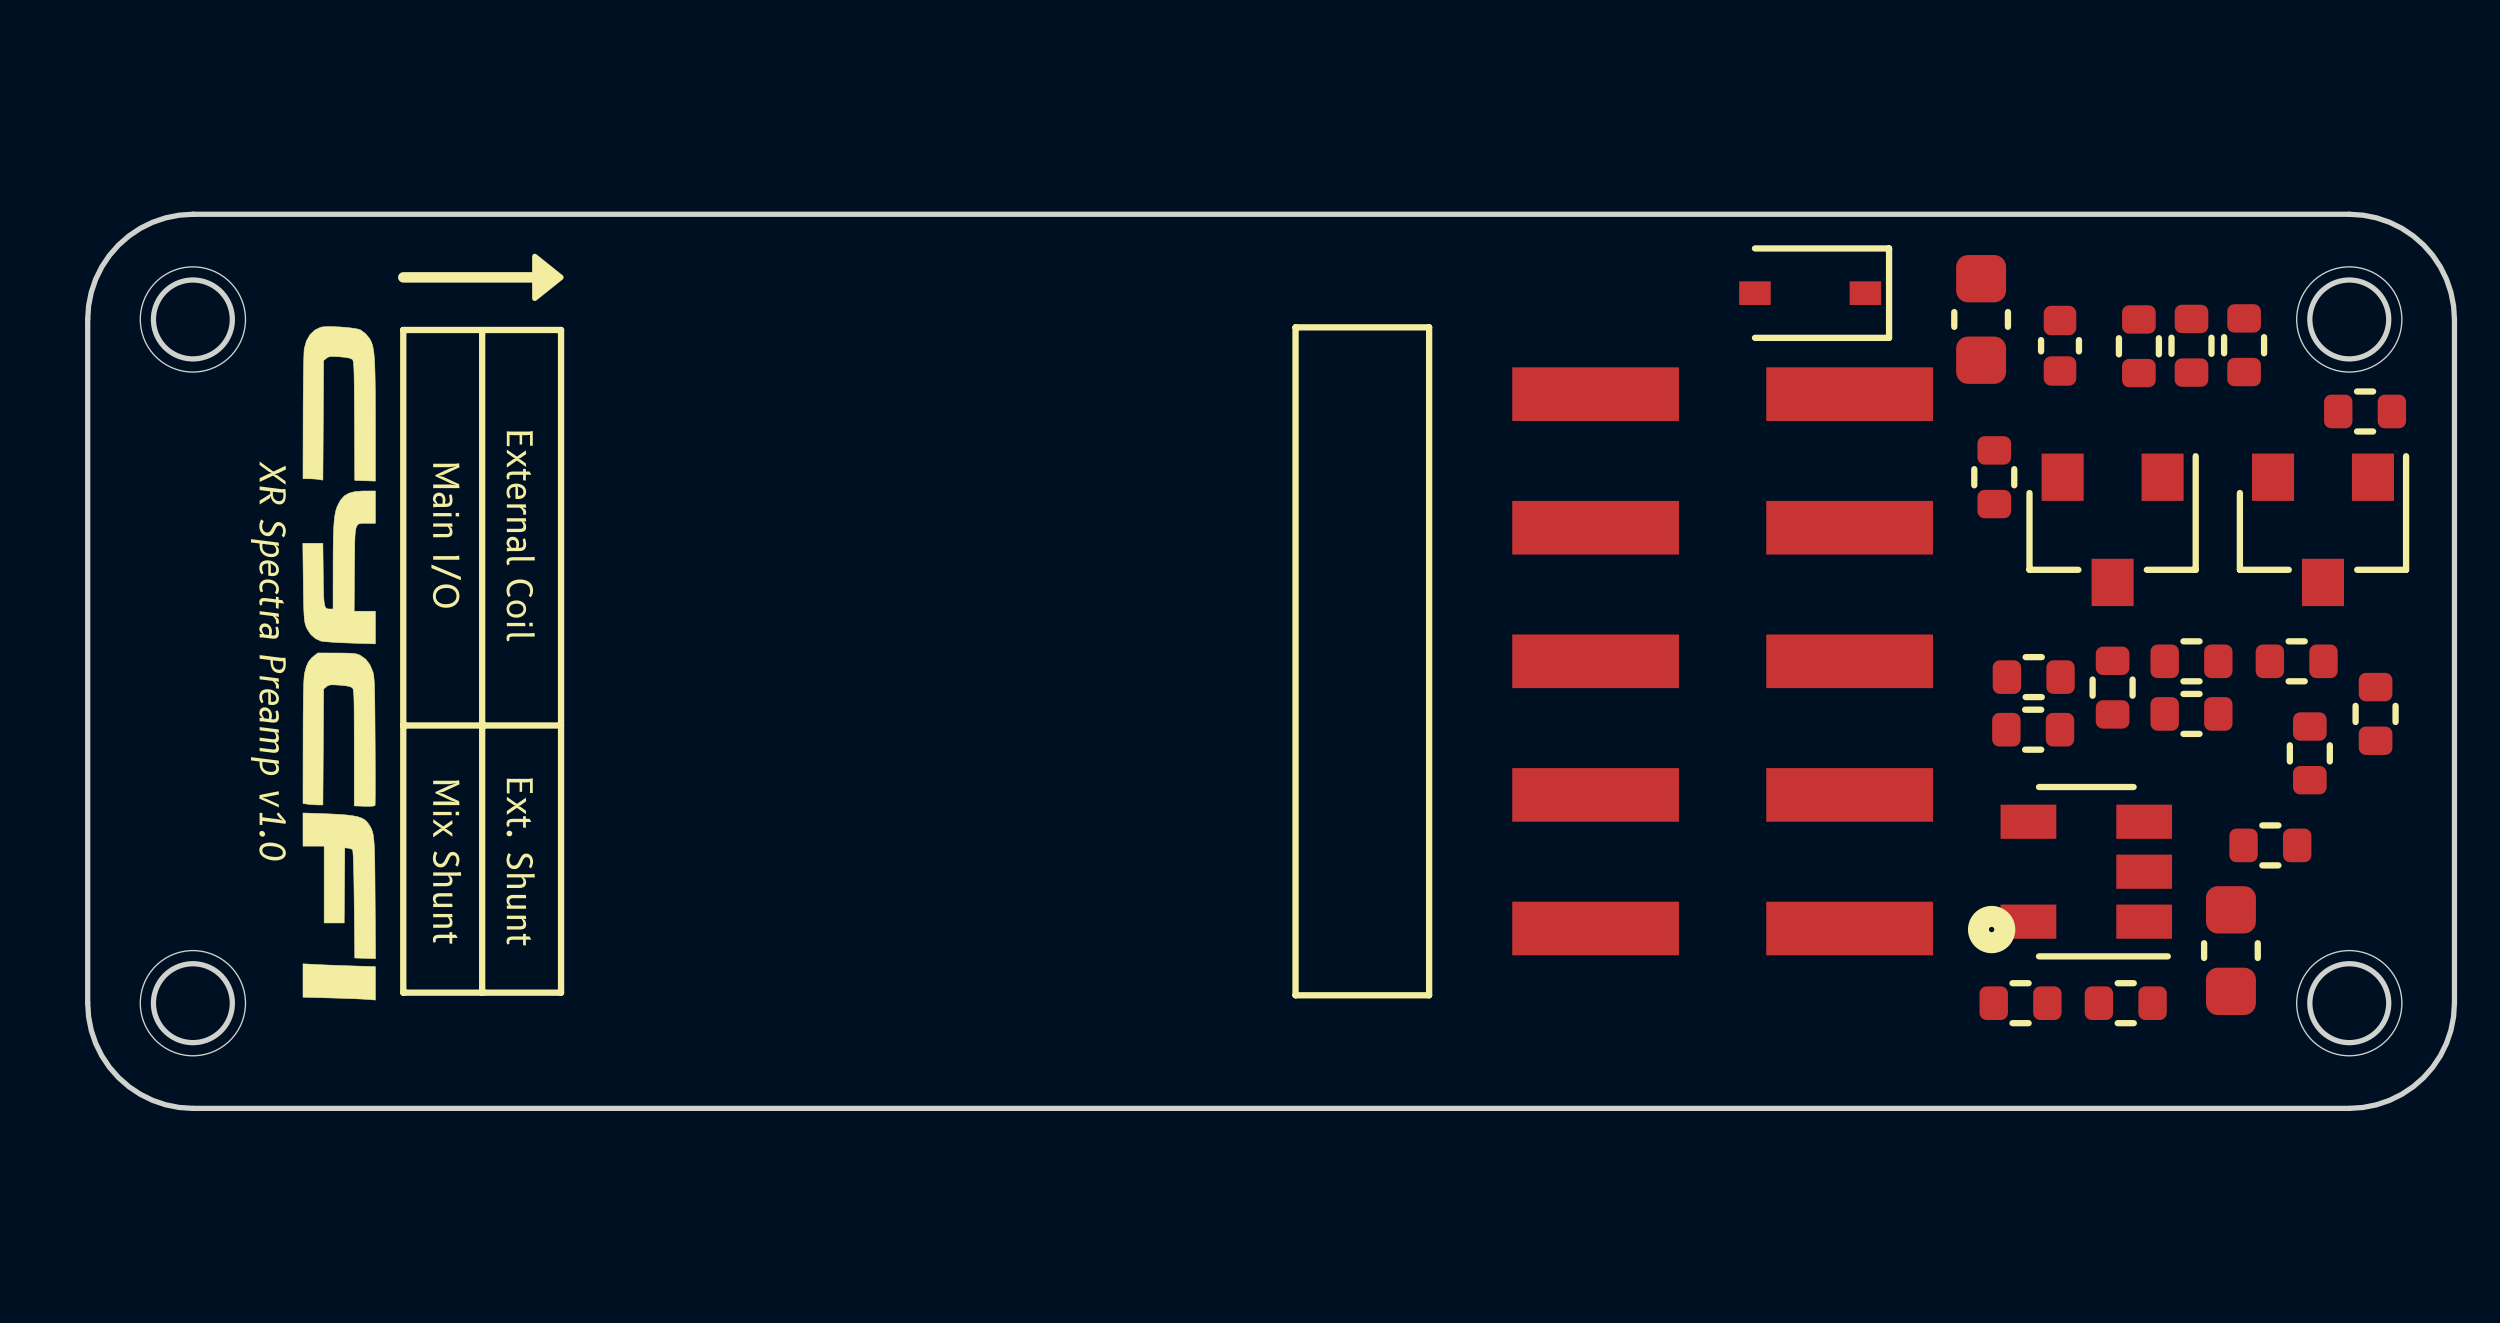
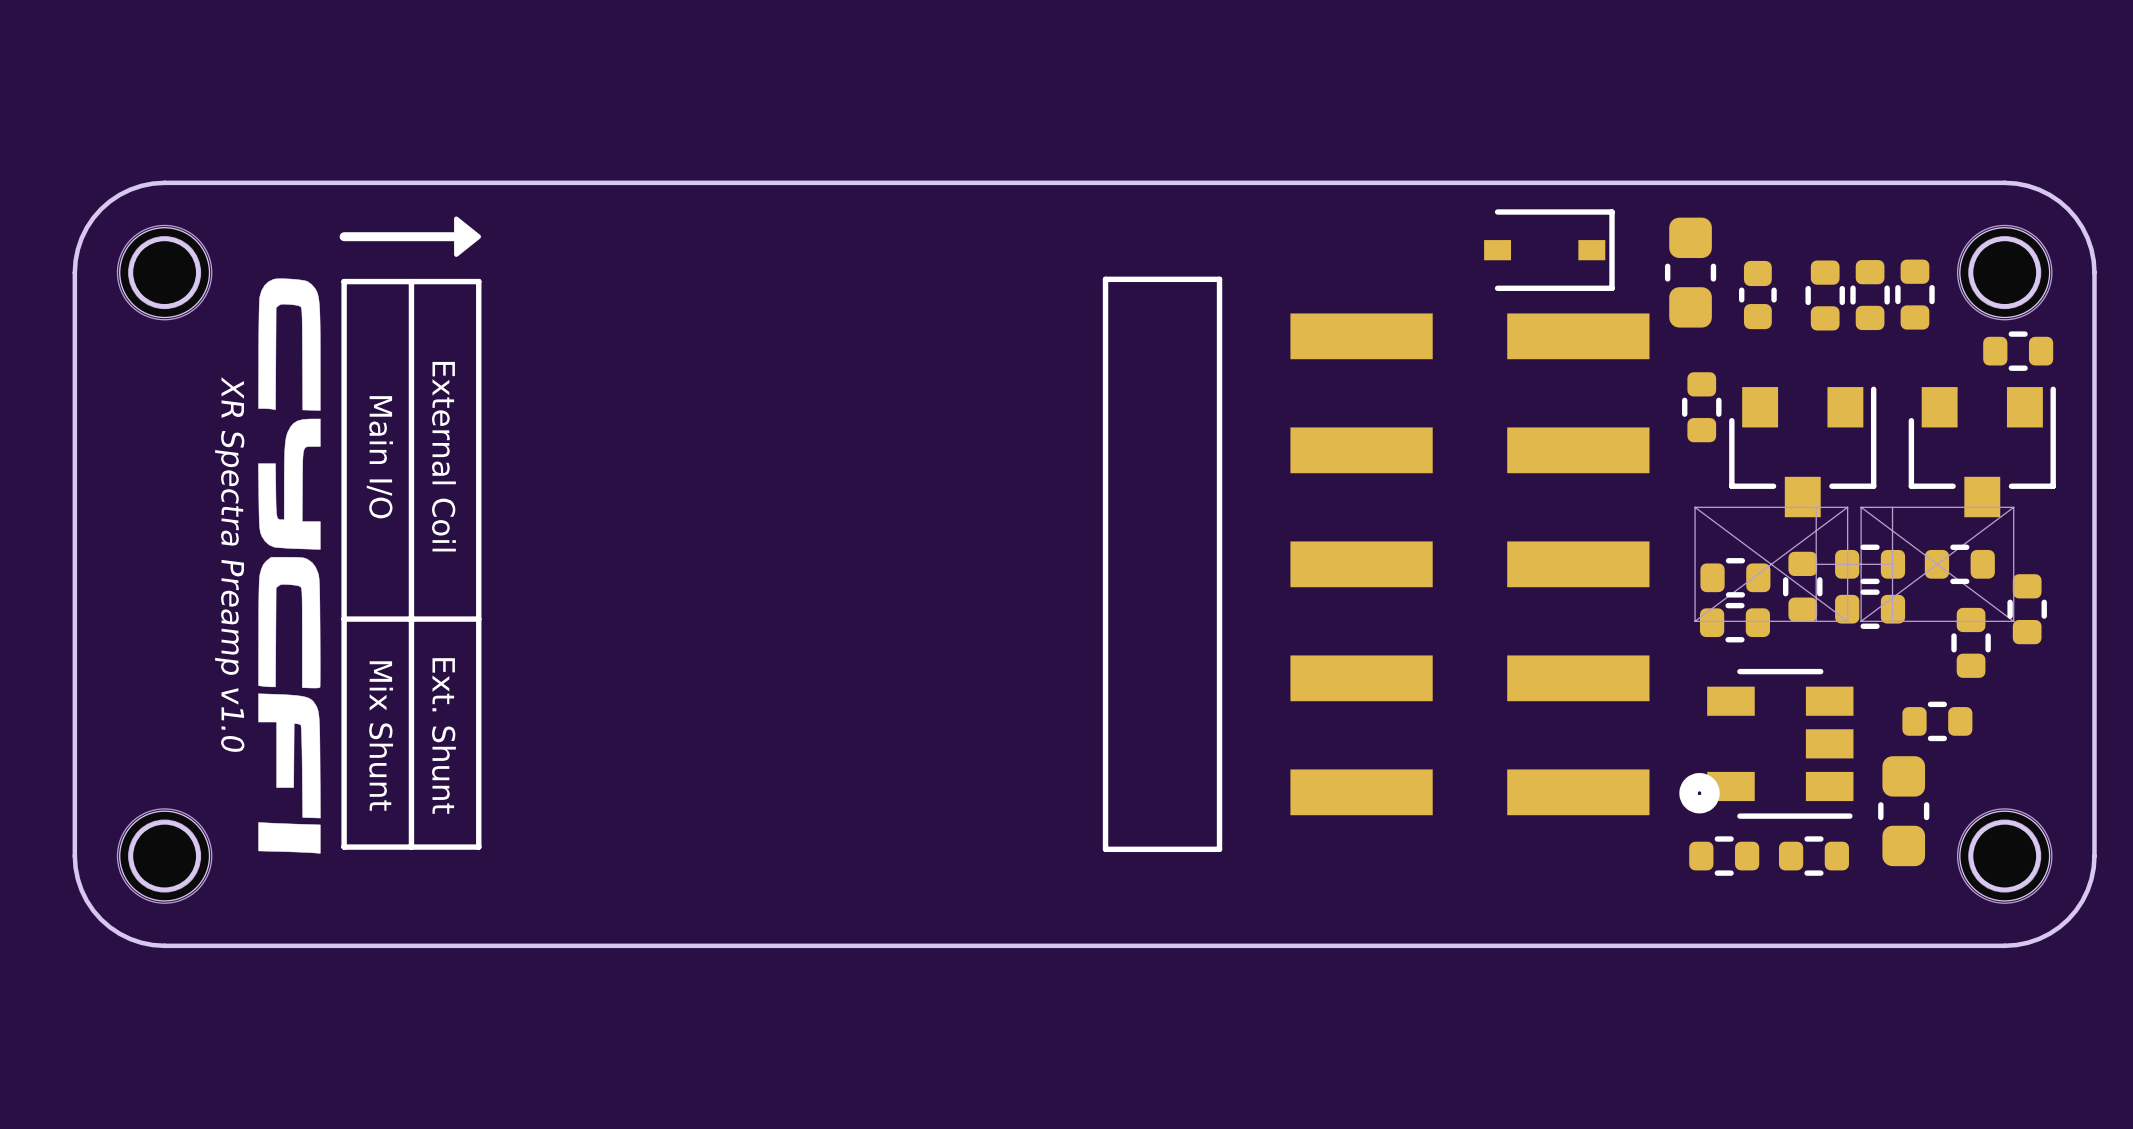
drawing: none -> [117, 225, 212, 320]
drawing: none -> [1957, 225, 2052, 320]
line: none -> (1695, 507) (1847, 507)
line: none -> (1695, 507) (1847, 621)
line: none -> (1695, 507) (1695, 621)
line: none -> (1816, 507) (1816, 621)
line: none -> (1847, 507) (1695, 621)
line: none -> (1847, 507) (1847, 621)
line: none -> (1861, 507) (2013, 507)
line: none -> (1861, 507) (1861, 621)
line: none -> (1861, 507) (2013, 621)
line: none -> (1892, 507) (1892, 621)
line: none -> (2013, 507) (2013, 621)
line: none -> (2013, 507) (1861, 621)
line: none -> (1816, 564) (1892, 564)
line: none -> (1695, 621) (1847, 621)
line: none -> (1861, 621) (2013, 621)
drawing: none -> [117, 808, 212, 904]
drawing: none -> [1957, 808, 2052, 904]

